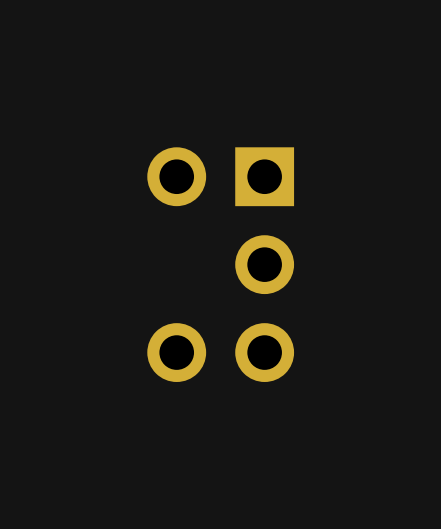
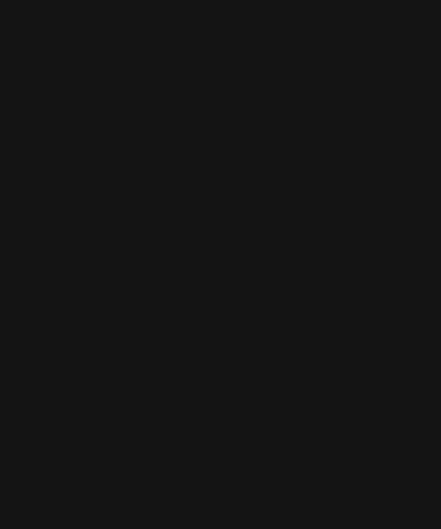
part: (220, 264) -> none

